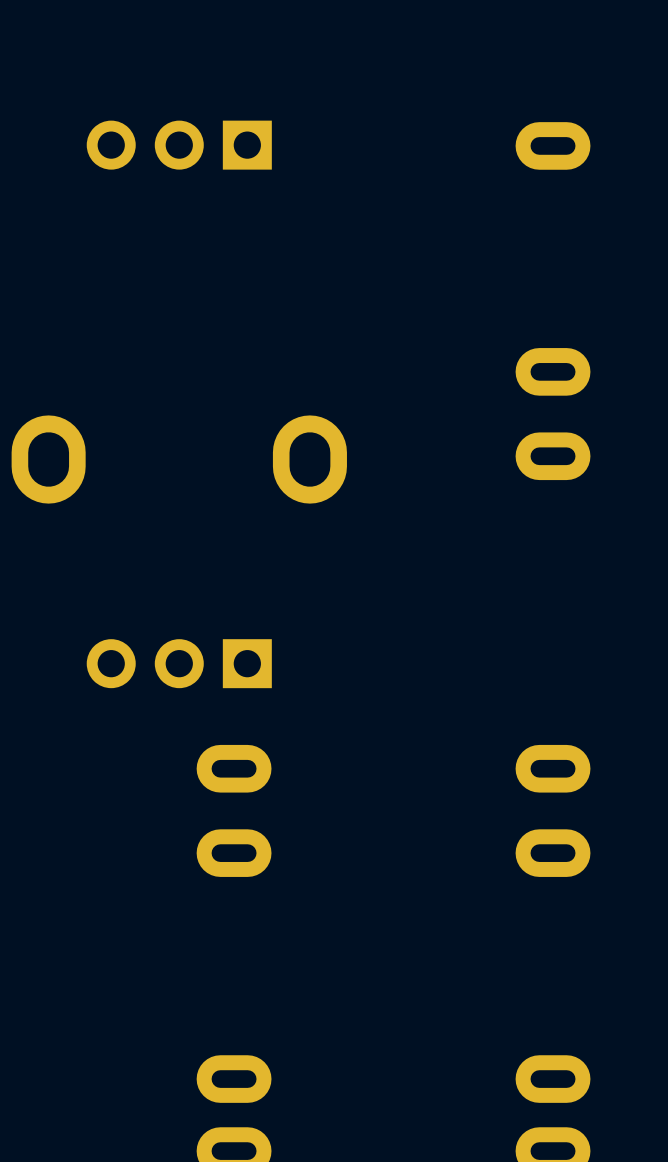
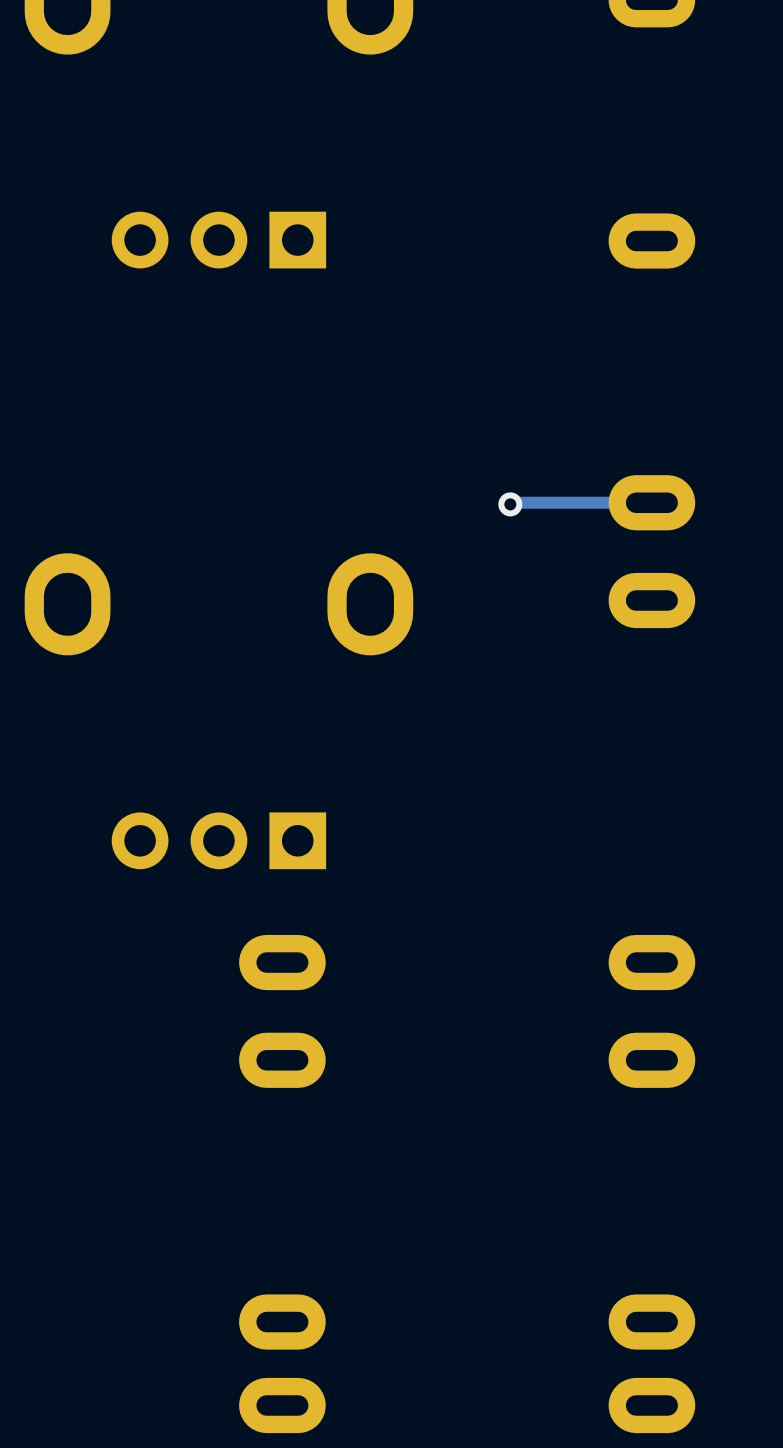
track: none -> (651, 502) (511, 502) (510, 504)
via: none -> (510, 504)

